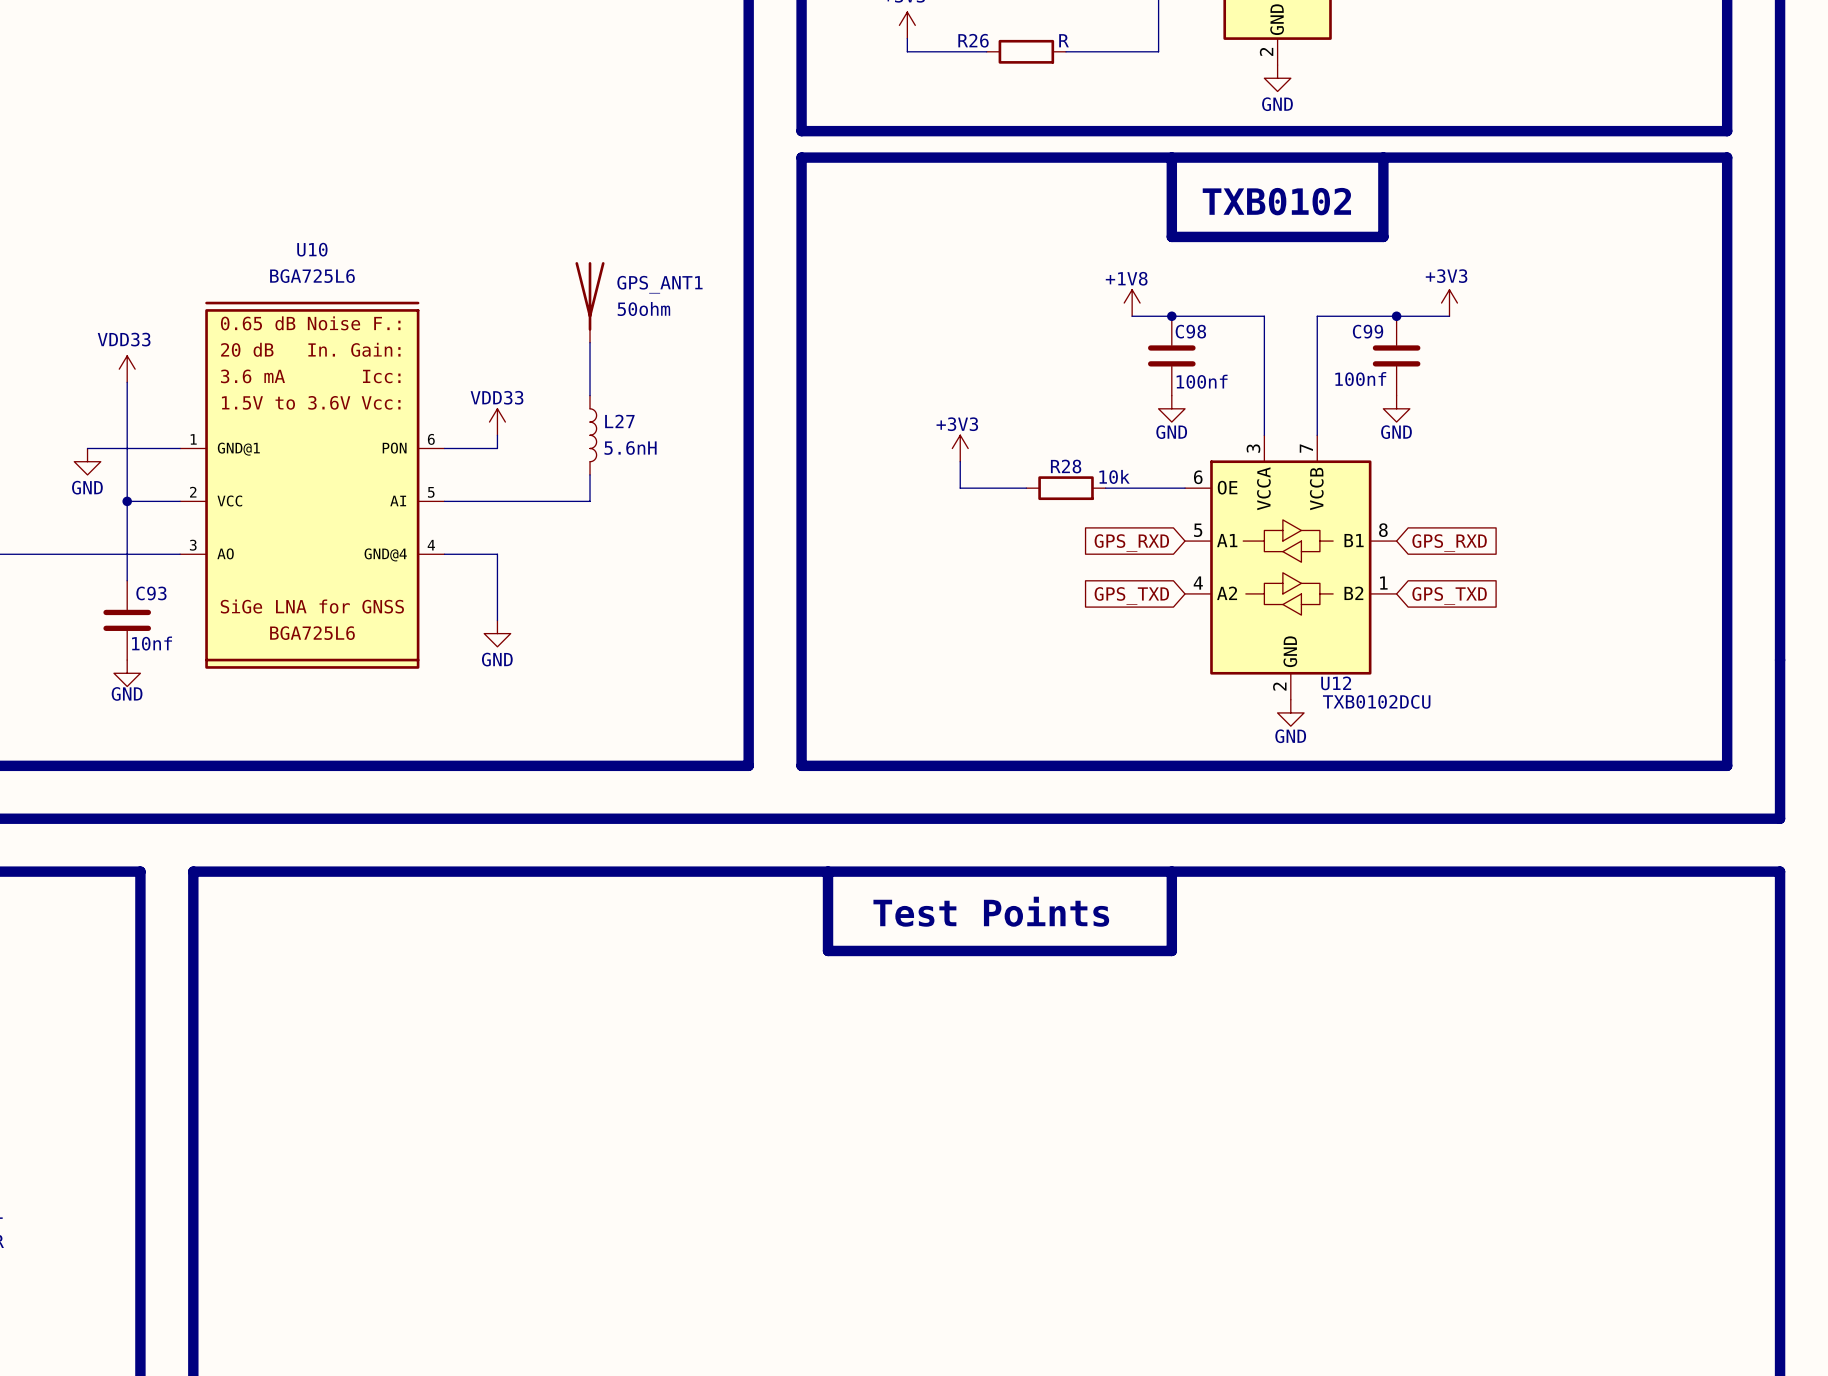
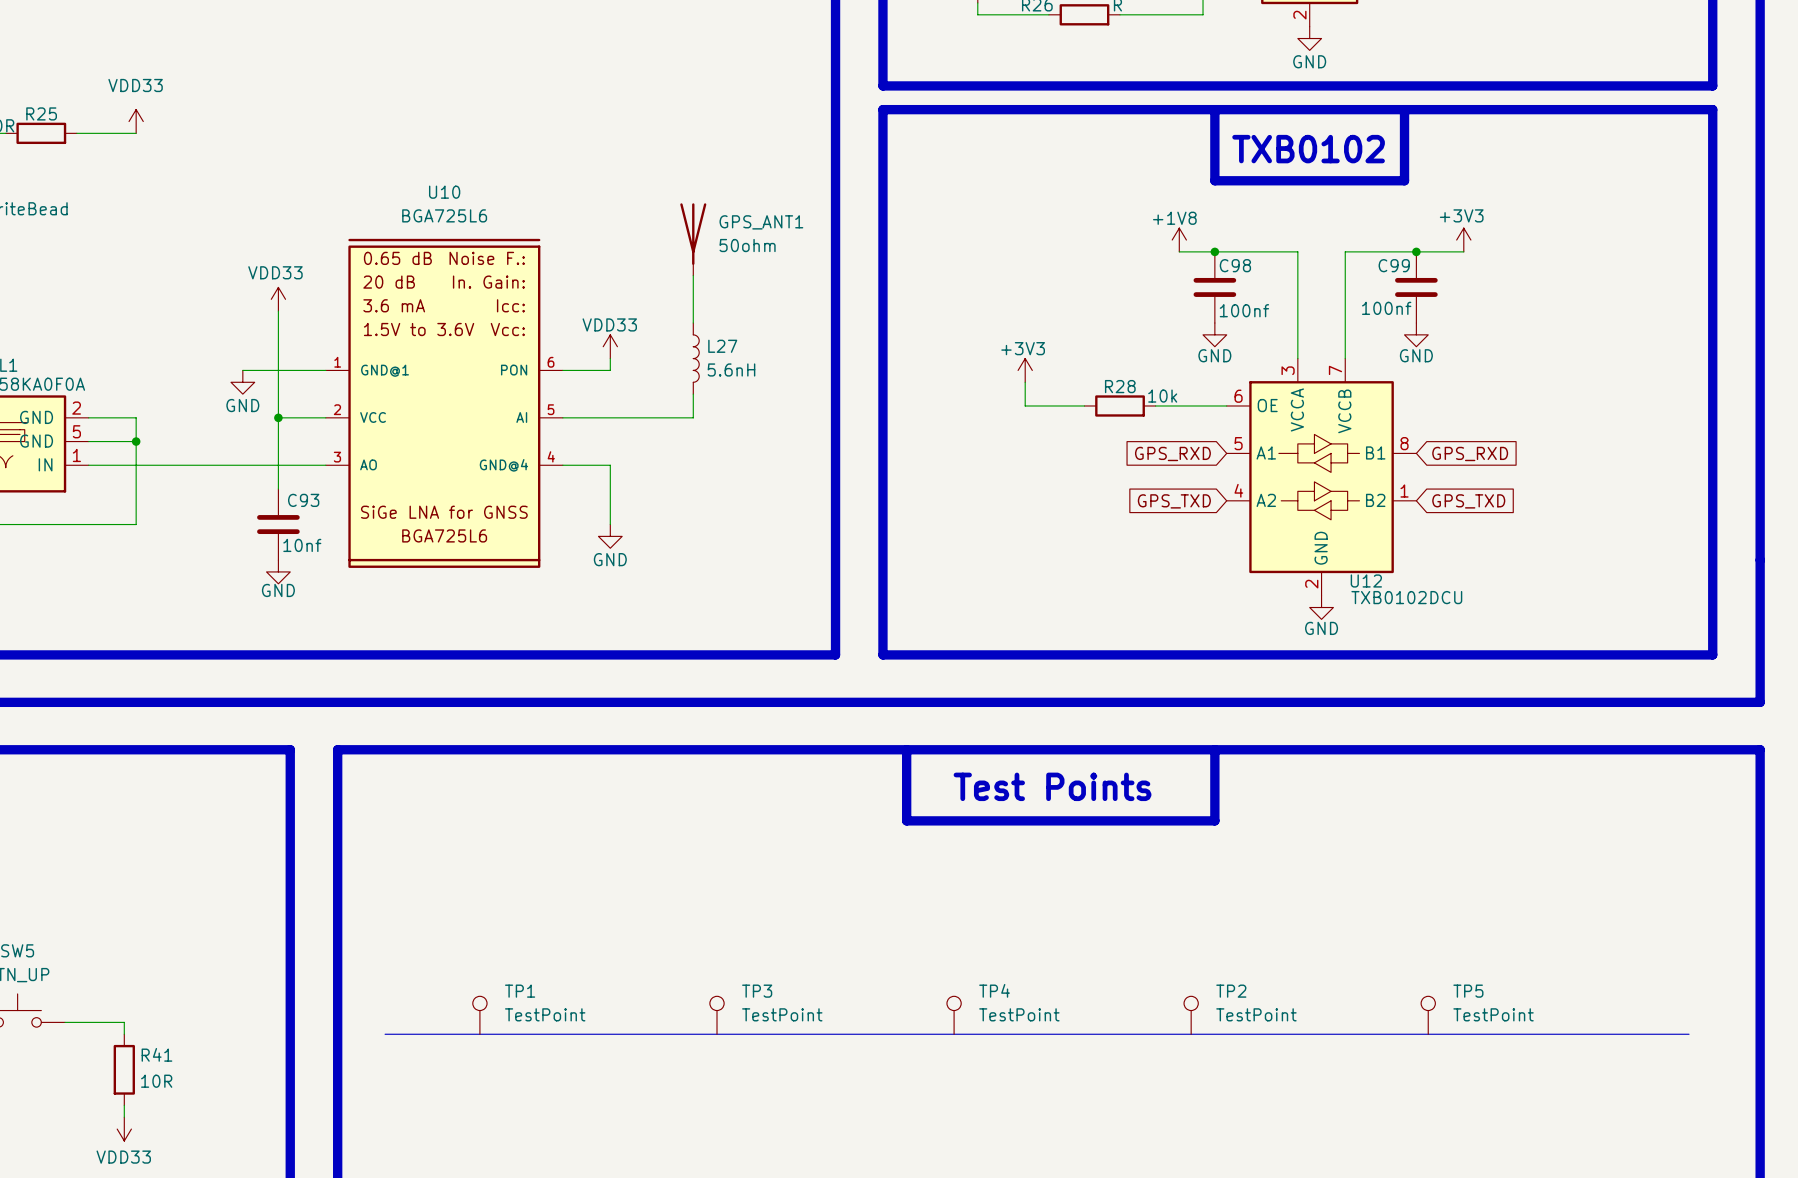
TP1: none -> TestPoint (479, 1015)
TP3: none -> TestPoint (717, 1015)
TP4: none -> TestPoint (954, 1015)
TP2: none -> TestPoint (1191, 1015)
TP5: none -> TestPoint (1428, 1015)
line: none -> (385, 1034) (1689, 1034)

